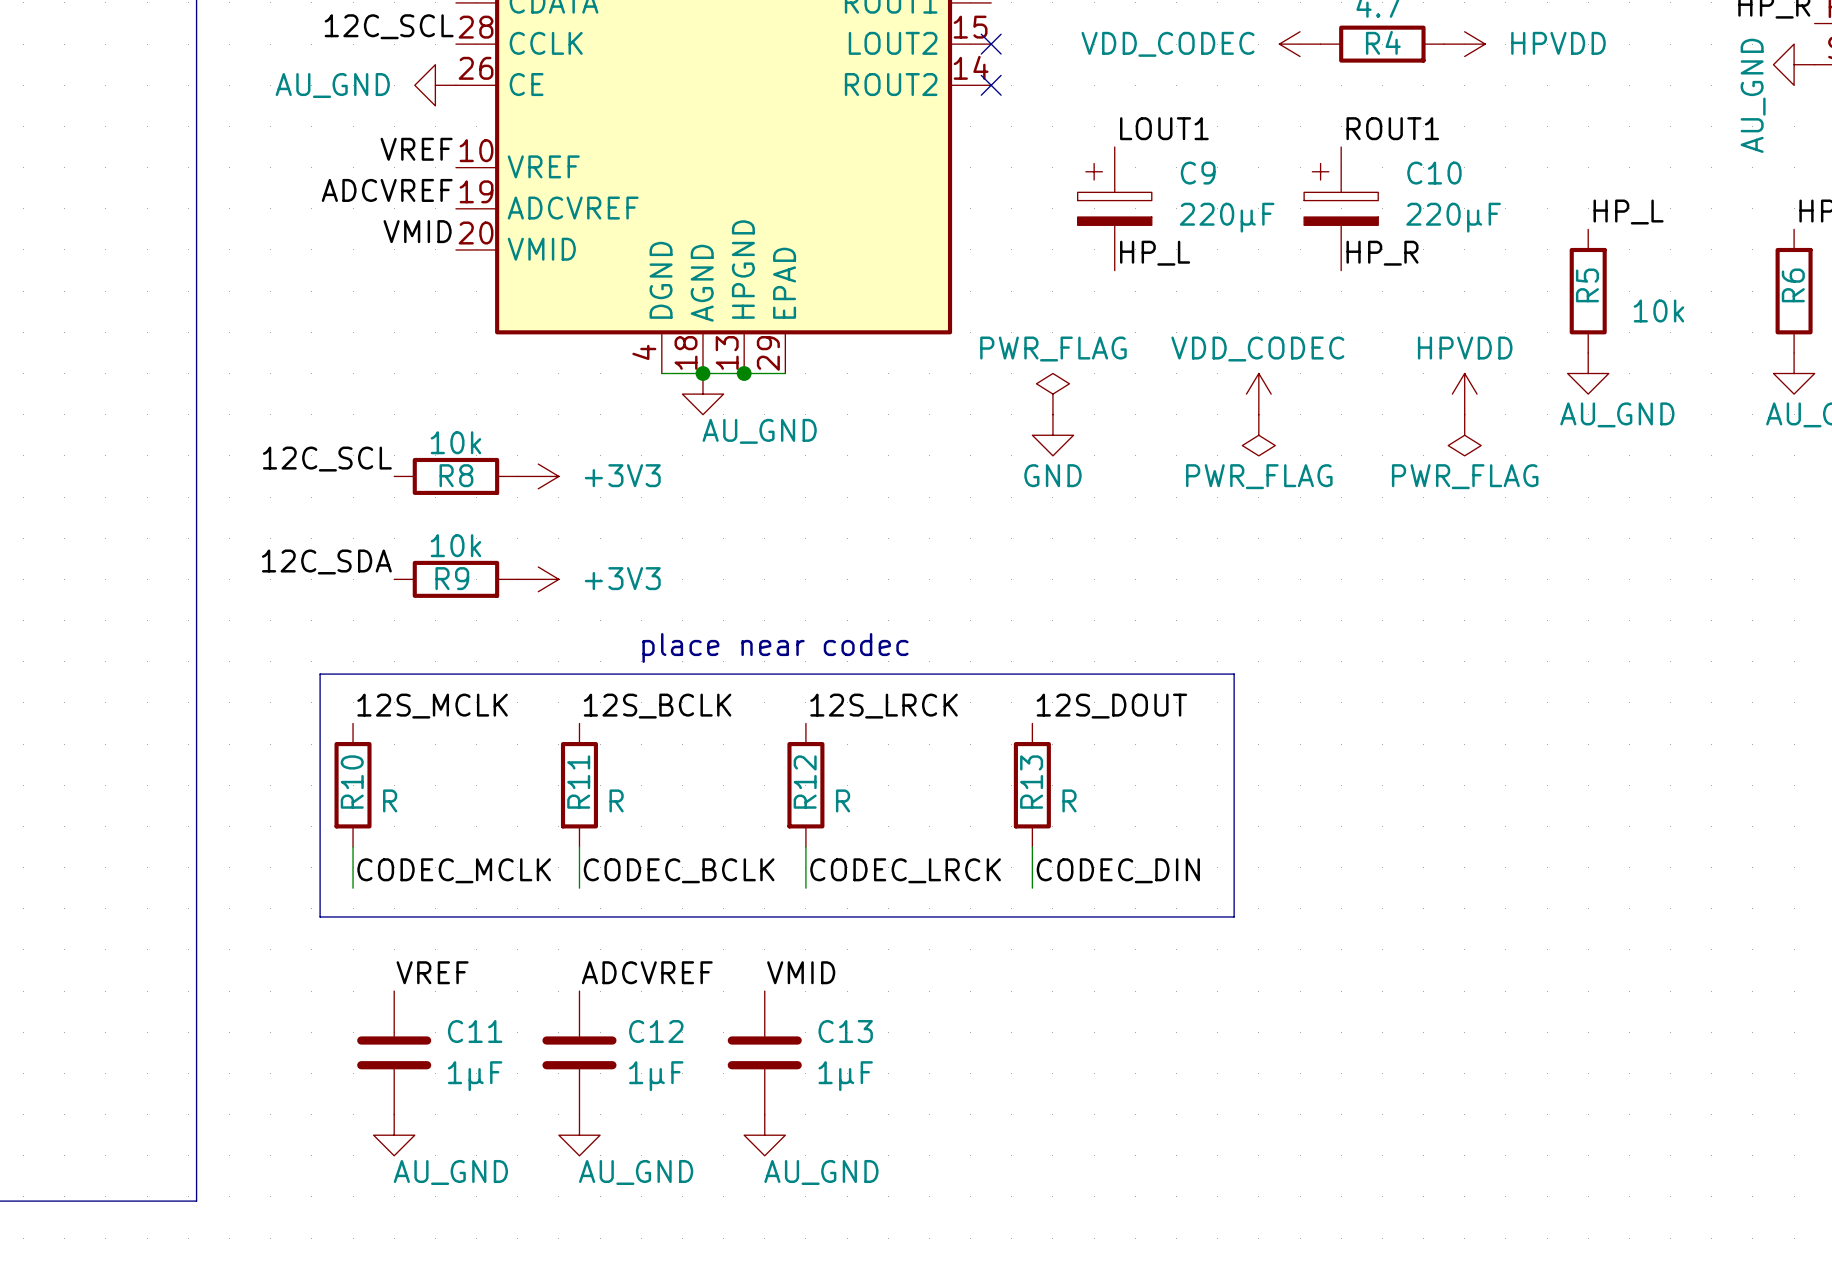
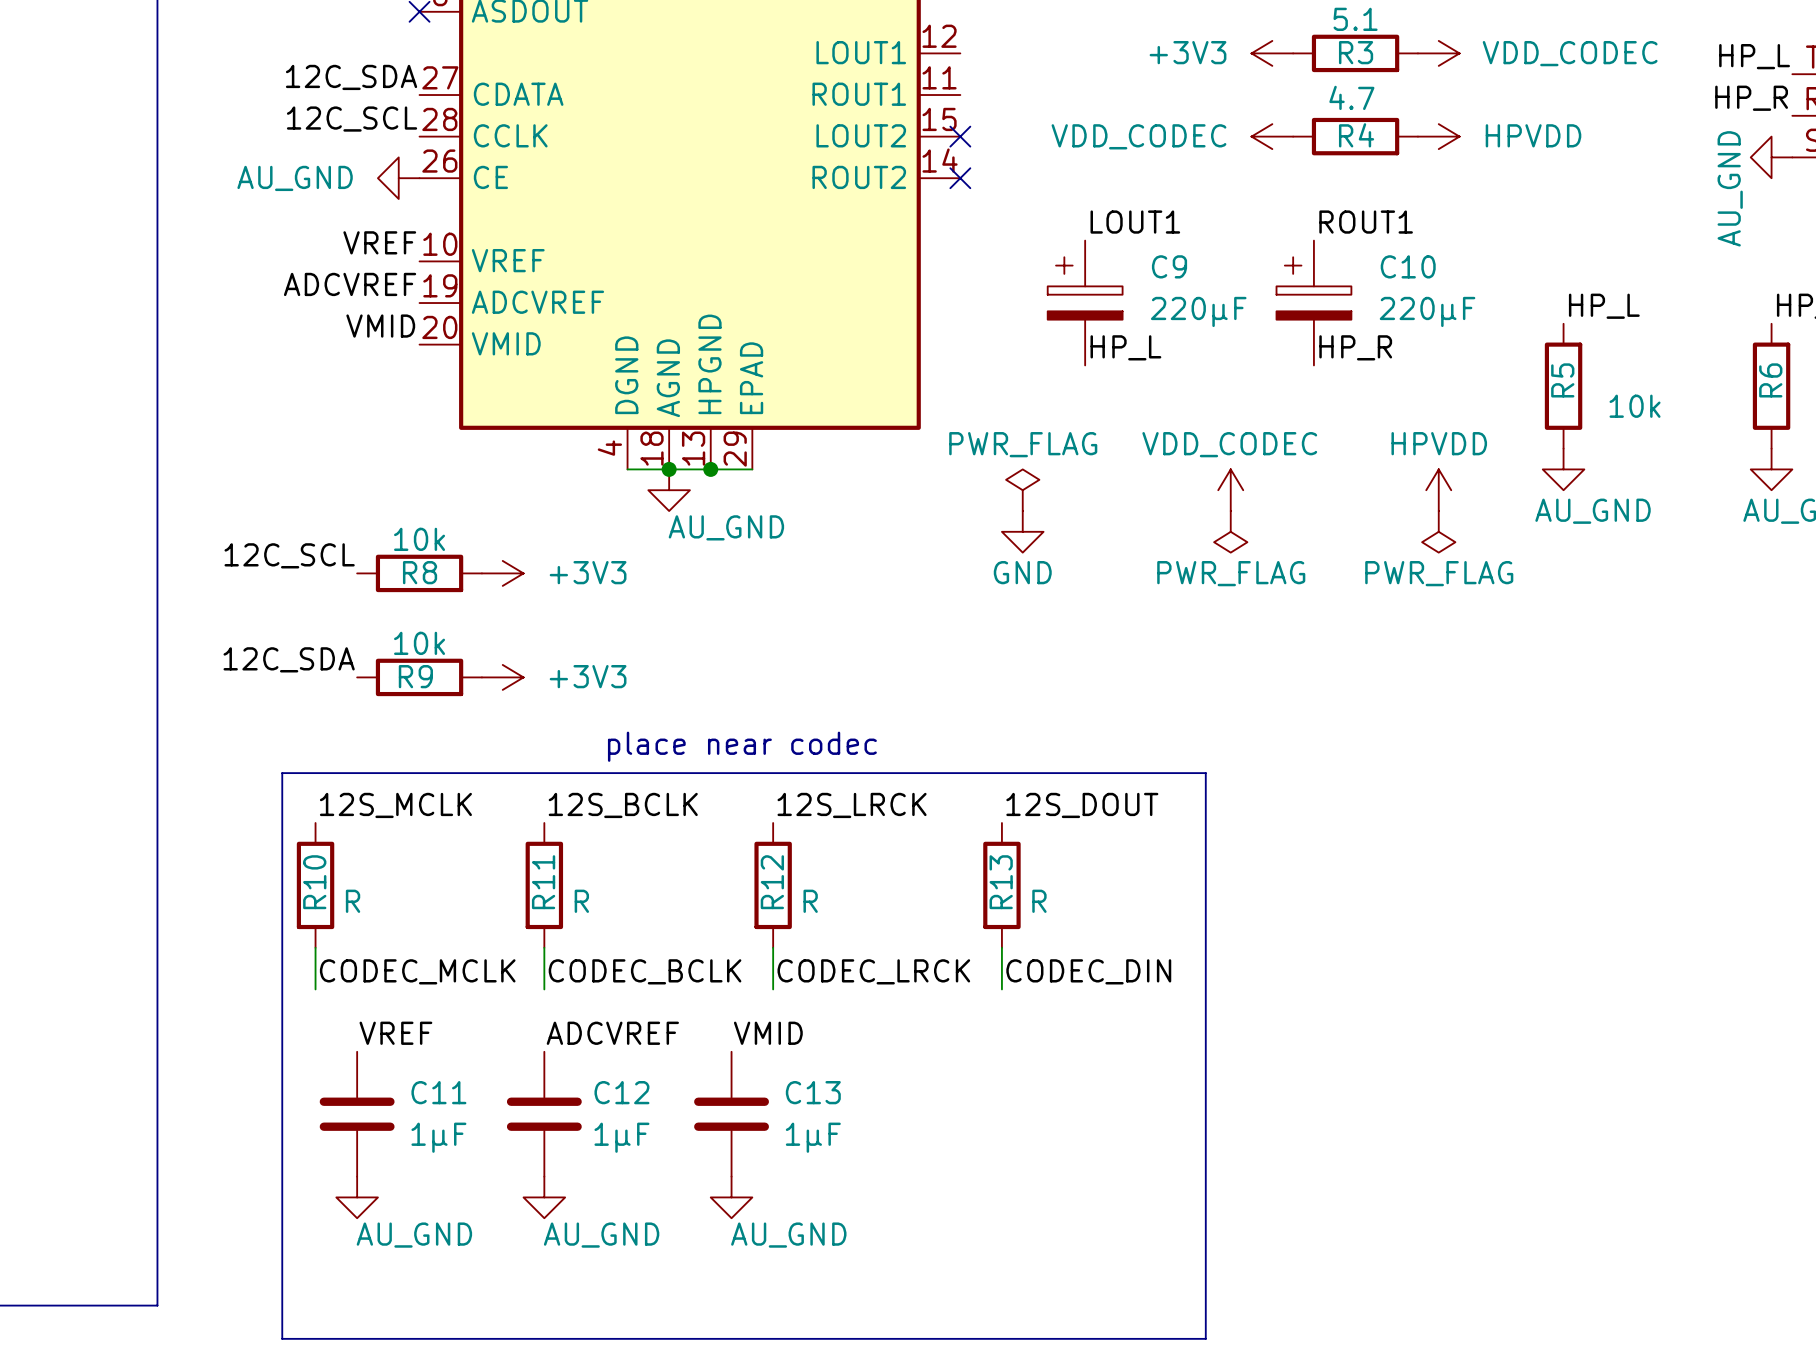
line: (320, 916) (1234, 916) -> (282, 1018) (282, 1338) (1205, 1338) (1205, 1018)
label position: VREF (432, 972) -> VREF (395, 1033)
label position: ADCVREF (647, 972) -> ADCVREF (612, 1033)
label position: VMID (801, 972) -> VMID (768, 1033)
C11 position: (394, 1052) -> (357, 1114)
C12 position: (579, 1052) -> (544, 1114)
C13 position: (764, 1052) -> (731, 1114)
power symbol position: AU_GND (394, 1135) -> AU_GND (357, 1197)
power symbol position: AU_GND (579, 1135) -> AU_GND (544, 1197)
power symbol position: AU_GND (764, 1135) -> AU_GND (731, 1197)

